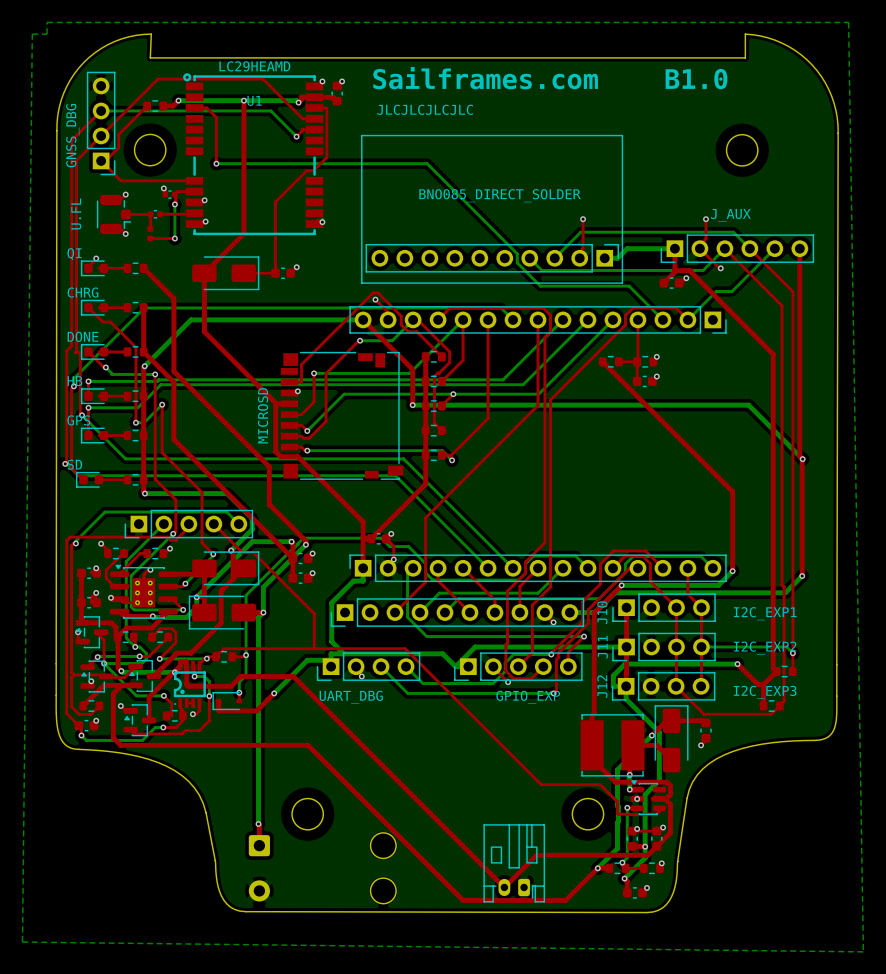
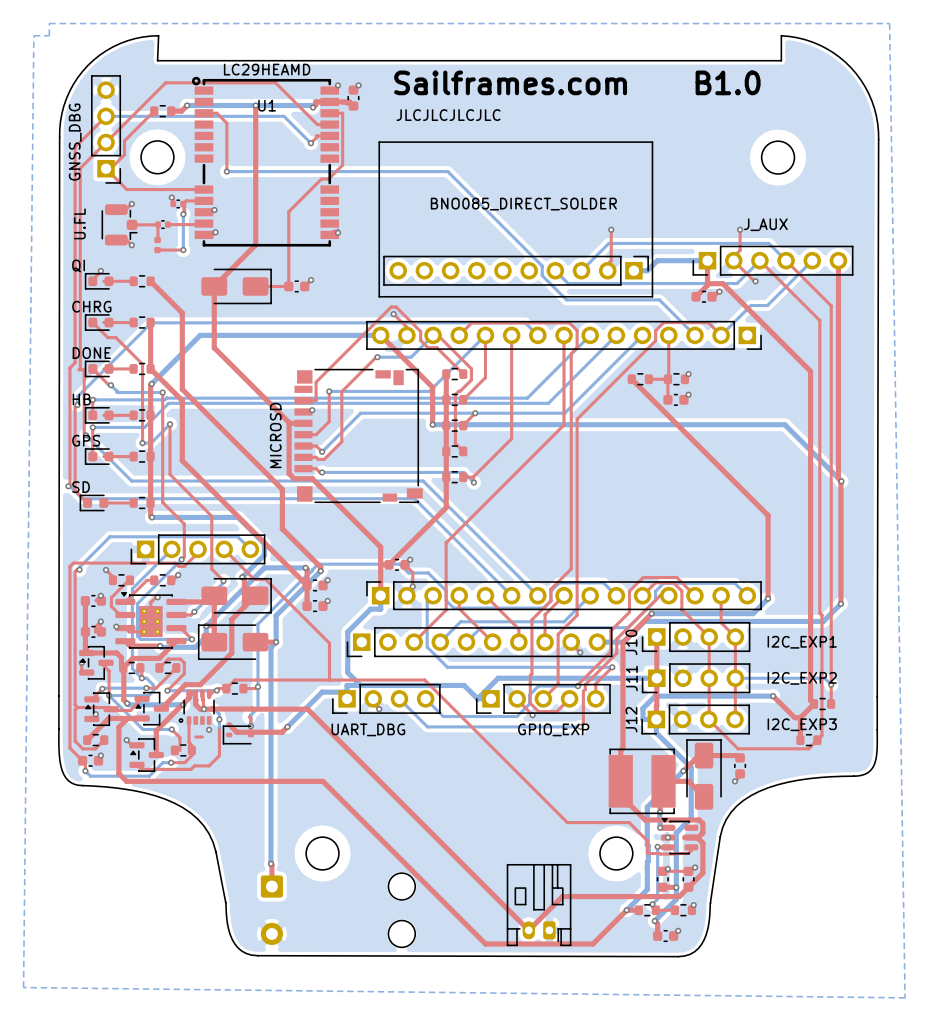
top track: (186, 672) (186, 684) (188, 686) (231, 686) (240, 676) -> (211, 709) (252, 709)
top track: none -> (195, 704) (200, 709) (211, 709)
part: none -> (196, 707)
top track: none -> (249, 716) (250, 724)
part: (189, 684) -> none
via: none -> (219, 719)
top track: none -> (189, 720) (189, 742)
via: none -> (209, 729)
via: (209, 696) -> none
top track: (269, 698) (256, 710) (218, 710) (218, 701) -> (282, 732) (236, 732) (229, 724)
top track: (199, 703) (199, 710) (192, 714) -> none
via: (192, 714) -> none

